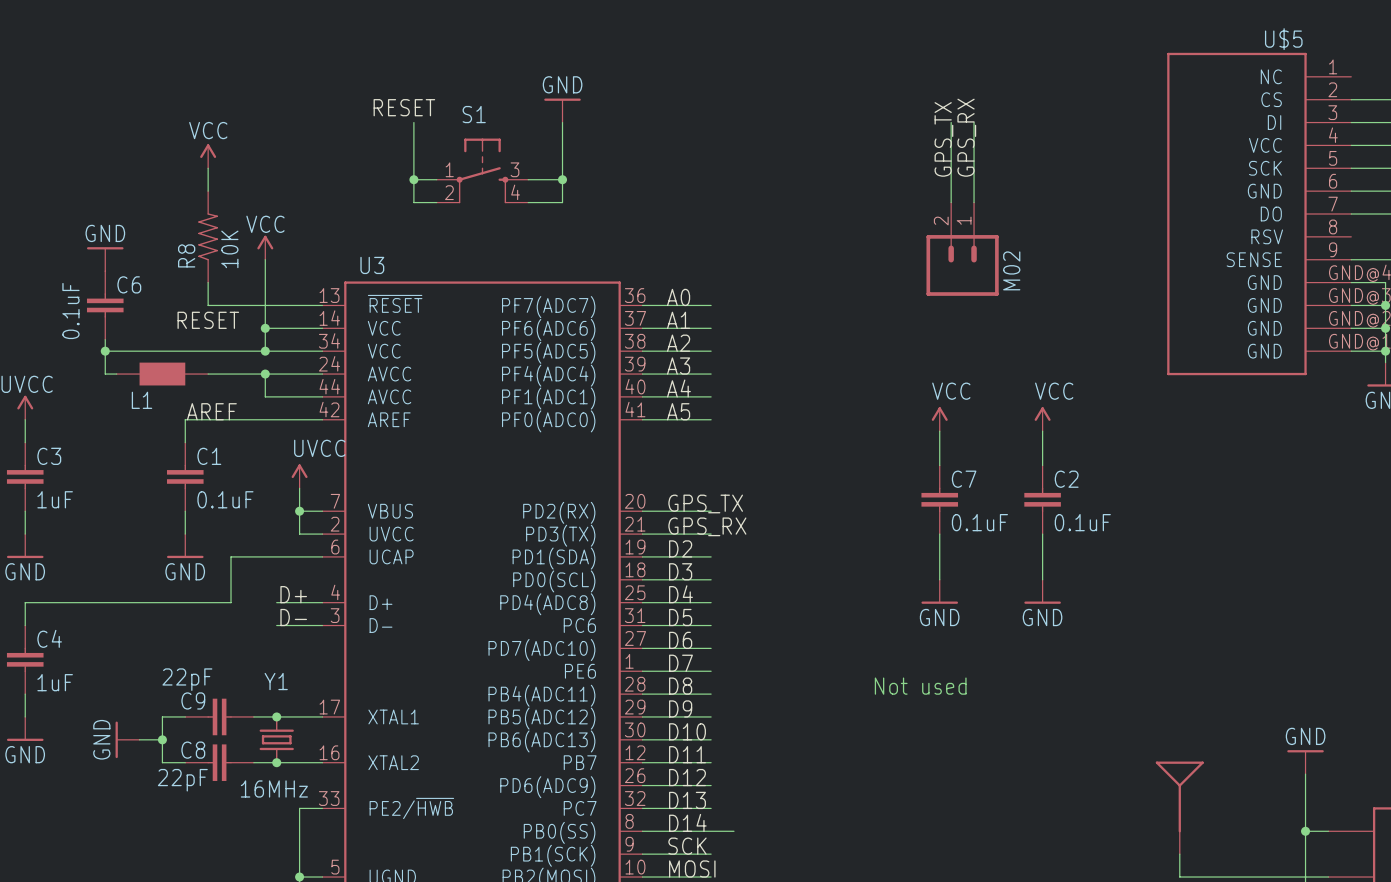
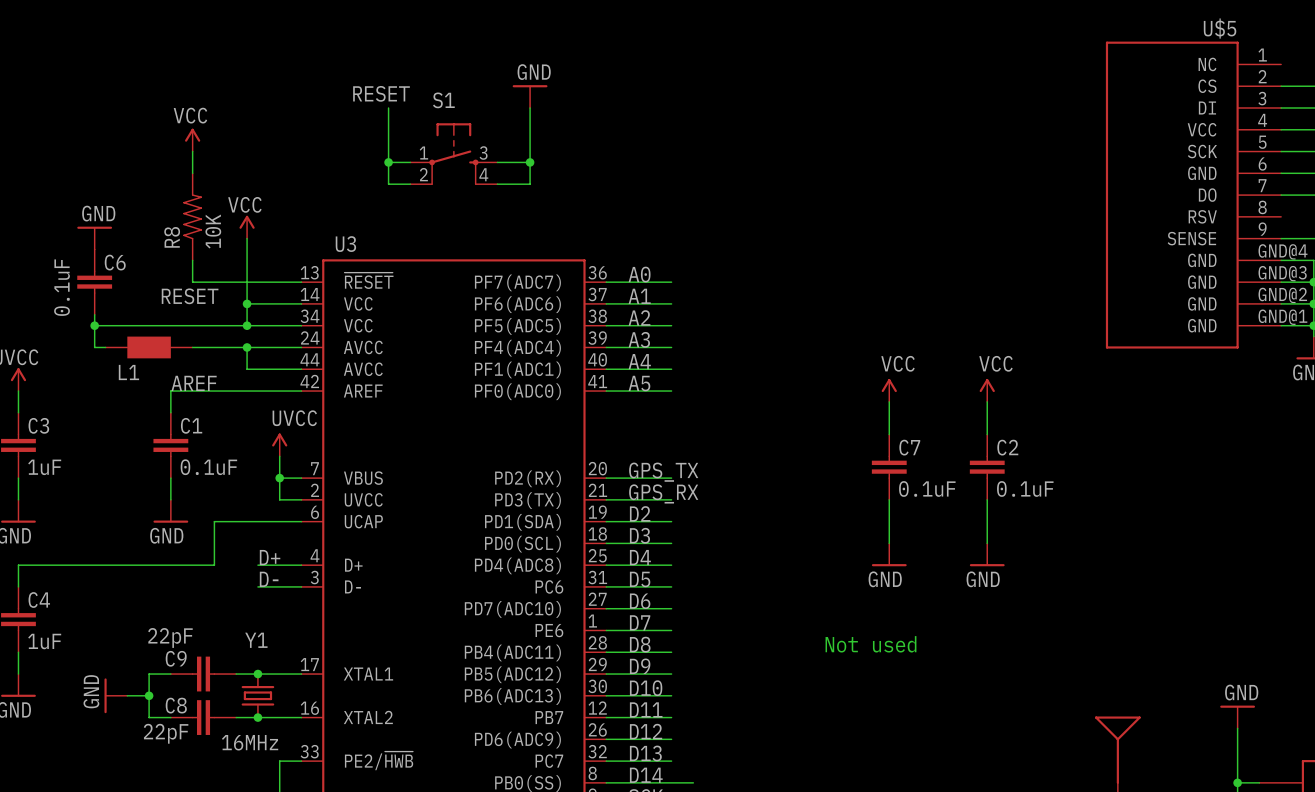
wire: (951, 122) (951, 202) -> none
wire: (974, 122) (974, 202) -> none
label: GPS_RX (966, 137) -> none
label: GPS_TX (943, 139) -> none
part: M02 (962, 249) -> none

